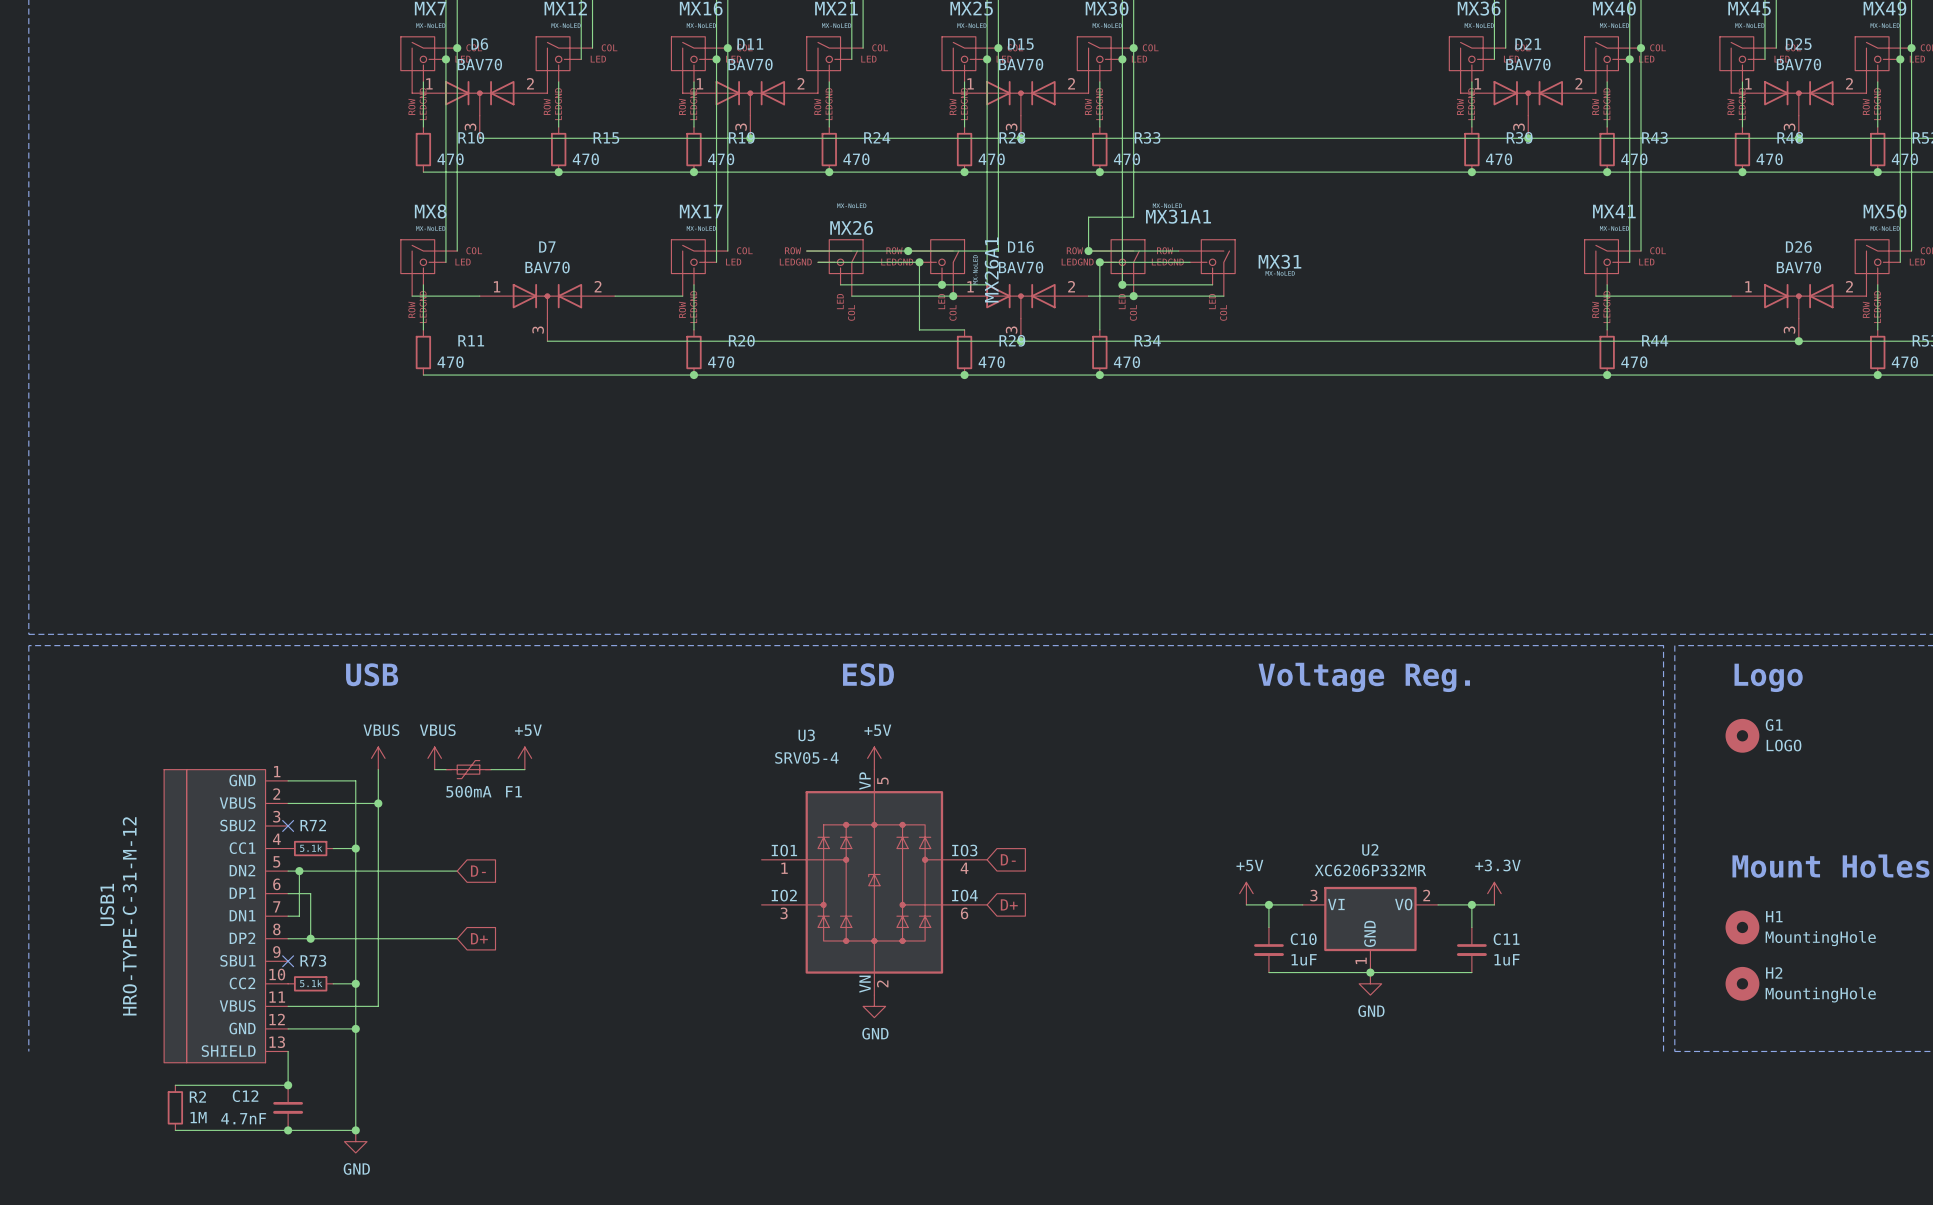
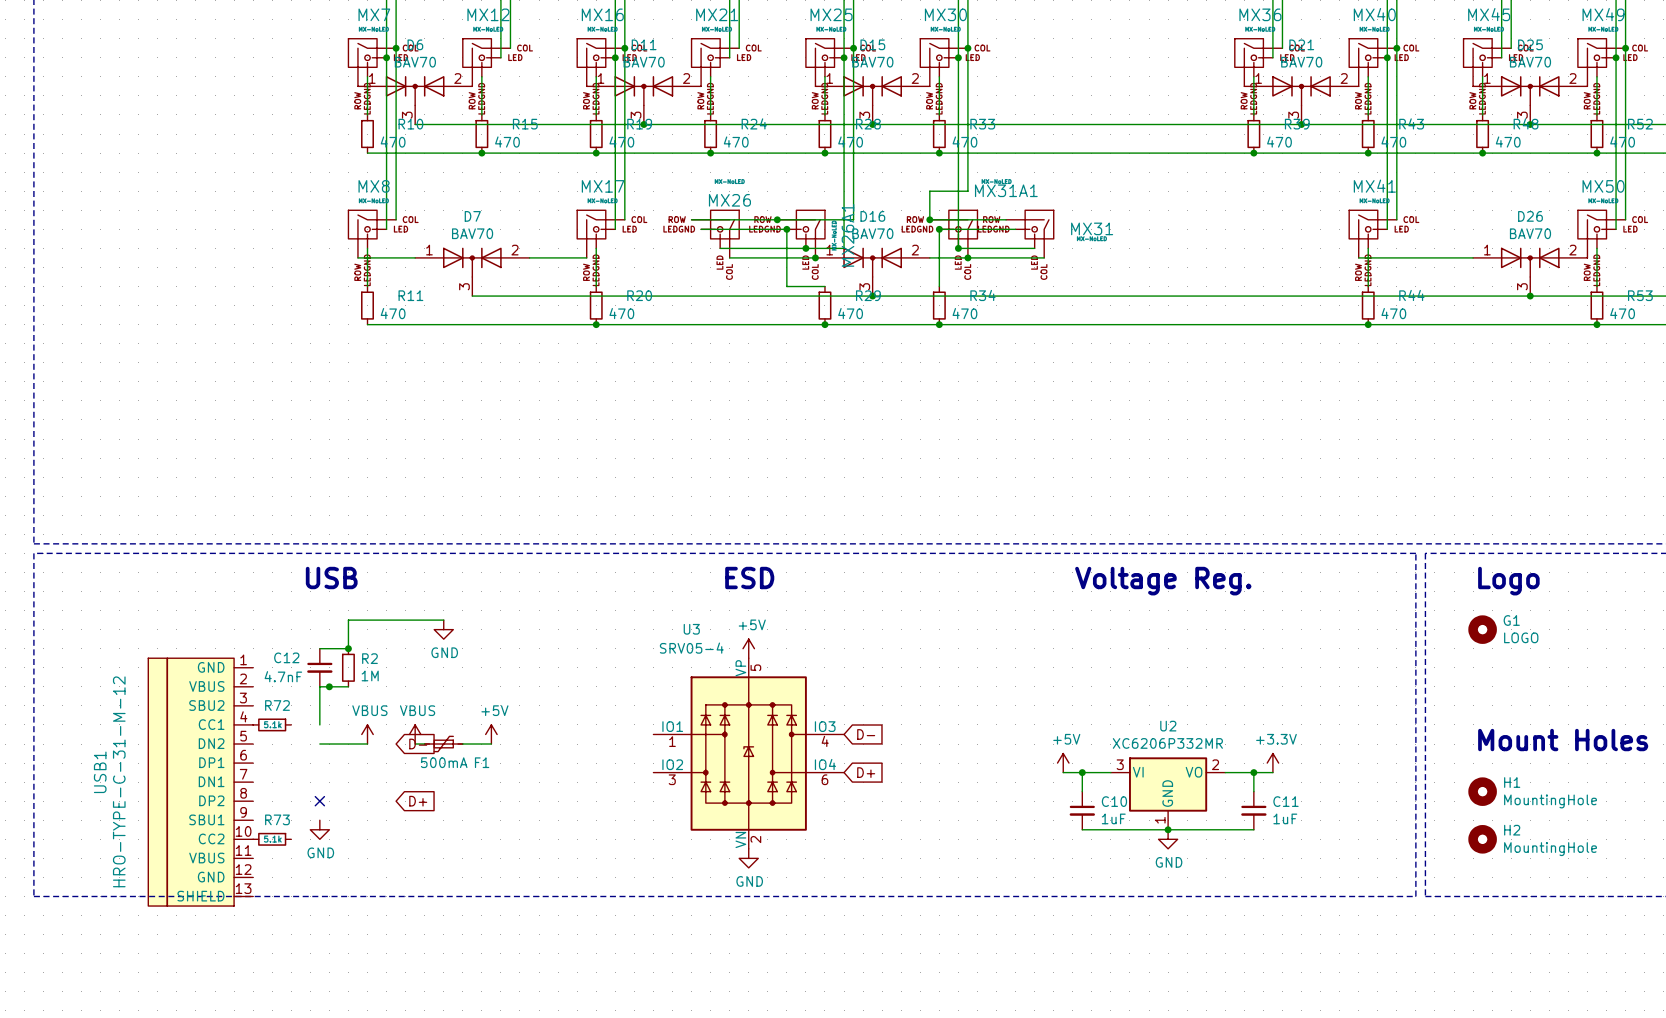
wire: none -> (443, 620) (348, 620) (348, 648) (319, 648)
power symbol: none -> GND (443, 629)
power symbol: VBUS (378, 758) -> none
junction: none -> (348, 648)
power symbol: VBUS (434, 758) -> none
power symbol position: +5V (524, 758) -> +5V (491, 734)
wire: (378, 769) (378, 1006) (288, 1006) -> none
wire: (434, 769) (445, 769) -> (415, 744) (424, 744)
F1 position: (468, 769) -> (443, 744)
wire: (491, 769) (524, 769) -> (462, 744) (491, 744)
wire: (288, 780) (355, 780) (355, 1130) (175, 1130) -> none
wire: (288, 803) (367, 803) -> (319, 724) (319, 686)
no-connect mark: (288, 825) -> none
wire: (333, 848) (355, 848) -> (329, 686) (348, 686)
junction: (355, 848) -> none
power symbol: none -> VBUS (367, 734)
power symbol: none -> VBUS (415, 734)
wire: (288, 871) (367, 871) -> none
wire: (299, 871) (299, 916) (288, 916) -> none
junction: (299, 871) -> none
wire: (423, 871) (457, 871) -> none
wire: (288, 893) (310, 893) (310, 938) -> none
wire: (288, 938) (457, 938) -> none
junction: (310, 938) -> none
no-connect mark: none -> (319, 801)
no-connect mark: (288, 961) -> none
wire: (333, 983) (355, 983) -> none
junction: (355, 983) -> none
wire: (288, 1028) (355, 1028) -> none
junction: (355, 1028) -> none
line: none -> (33, 896) (1415, 896)
wire: (288, 1051) (288, 1085) (175, 1085) -> none
junction: (288, 1085) -> none
R2 position: (175, 1107) -> (348, 667)
C12 position: (288, 1107) -> (319, 667)
junction: (288, 1130) -> none
junction: (355, 1130) -> none
power symbol position: GND (355, 1141) -> GND (319, 829)

